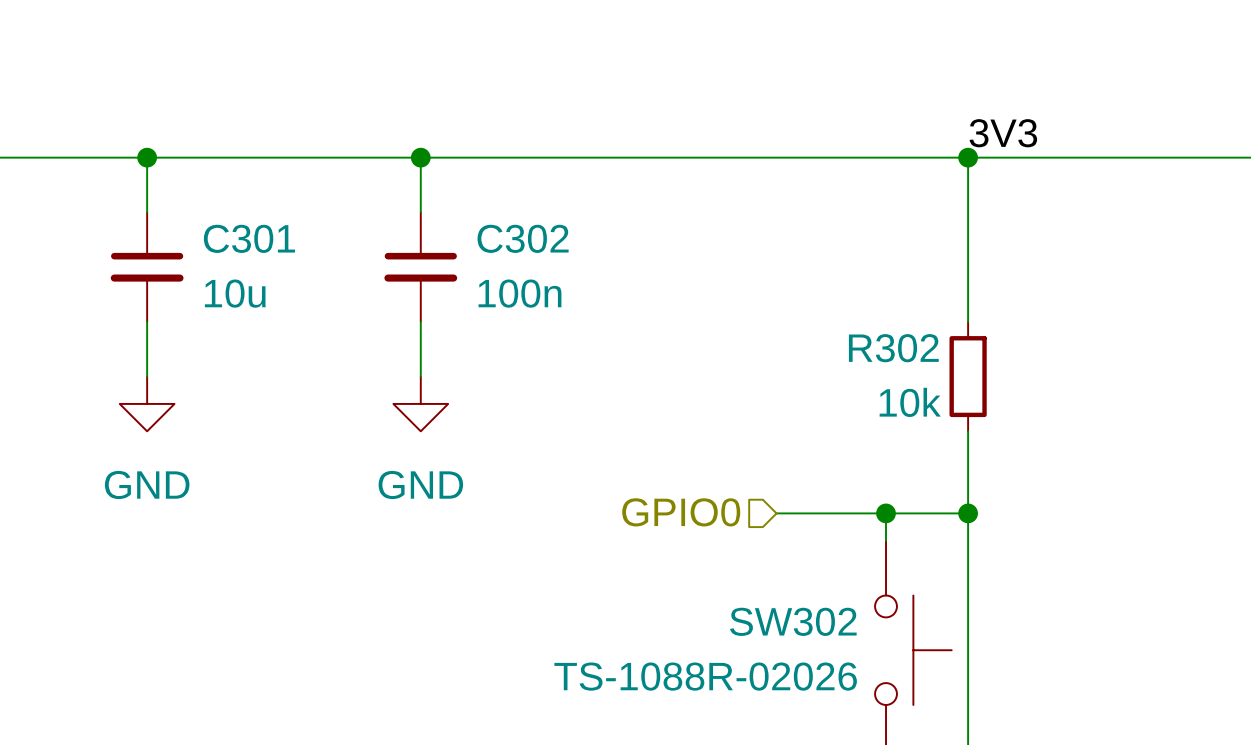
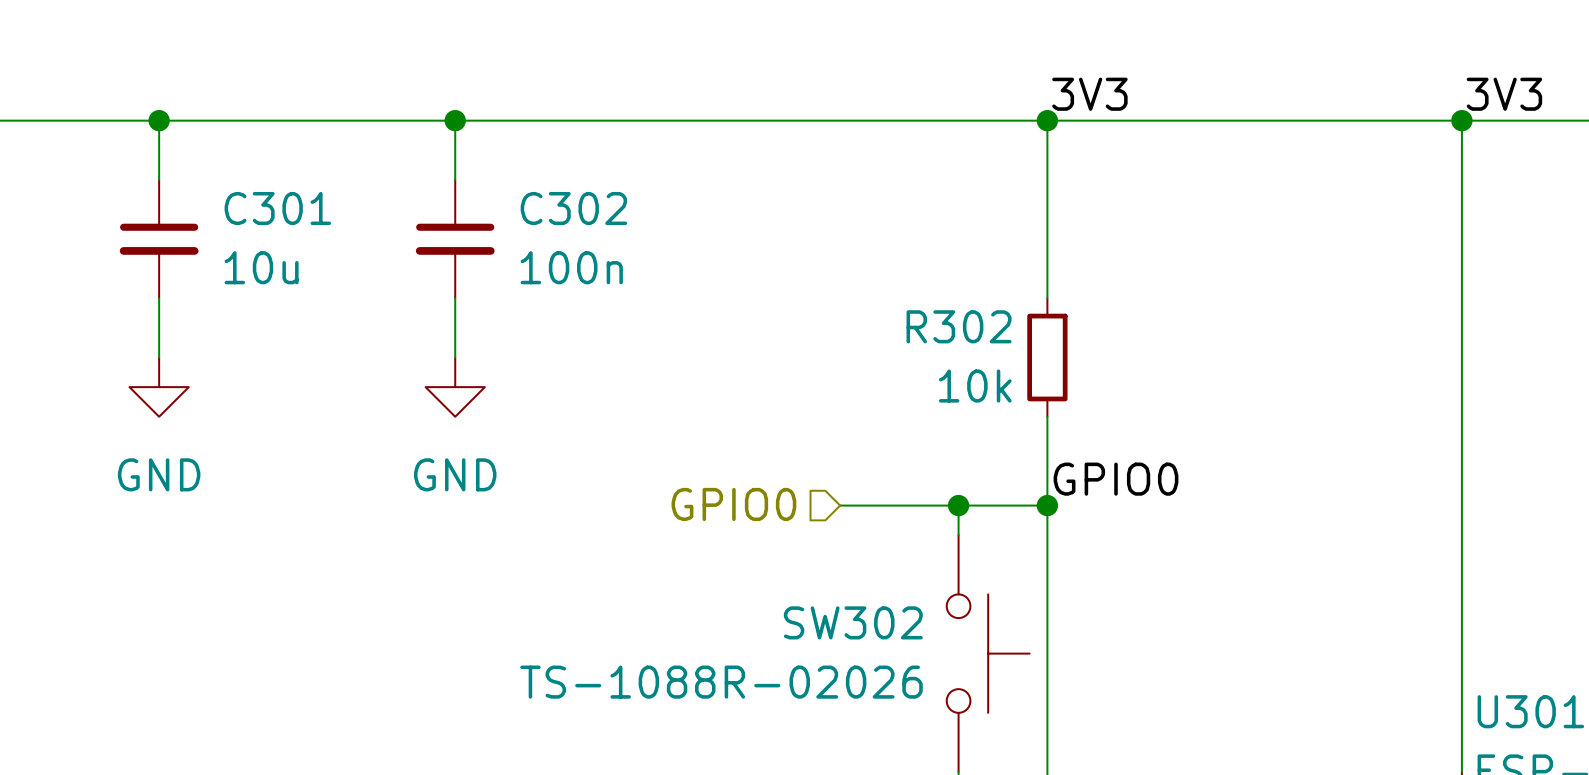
label: none -> GPIO0 (1116, 479)

